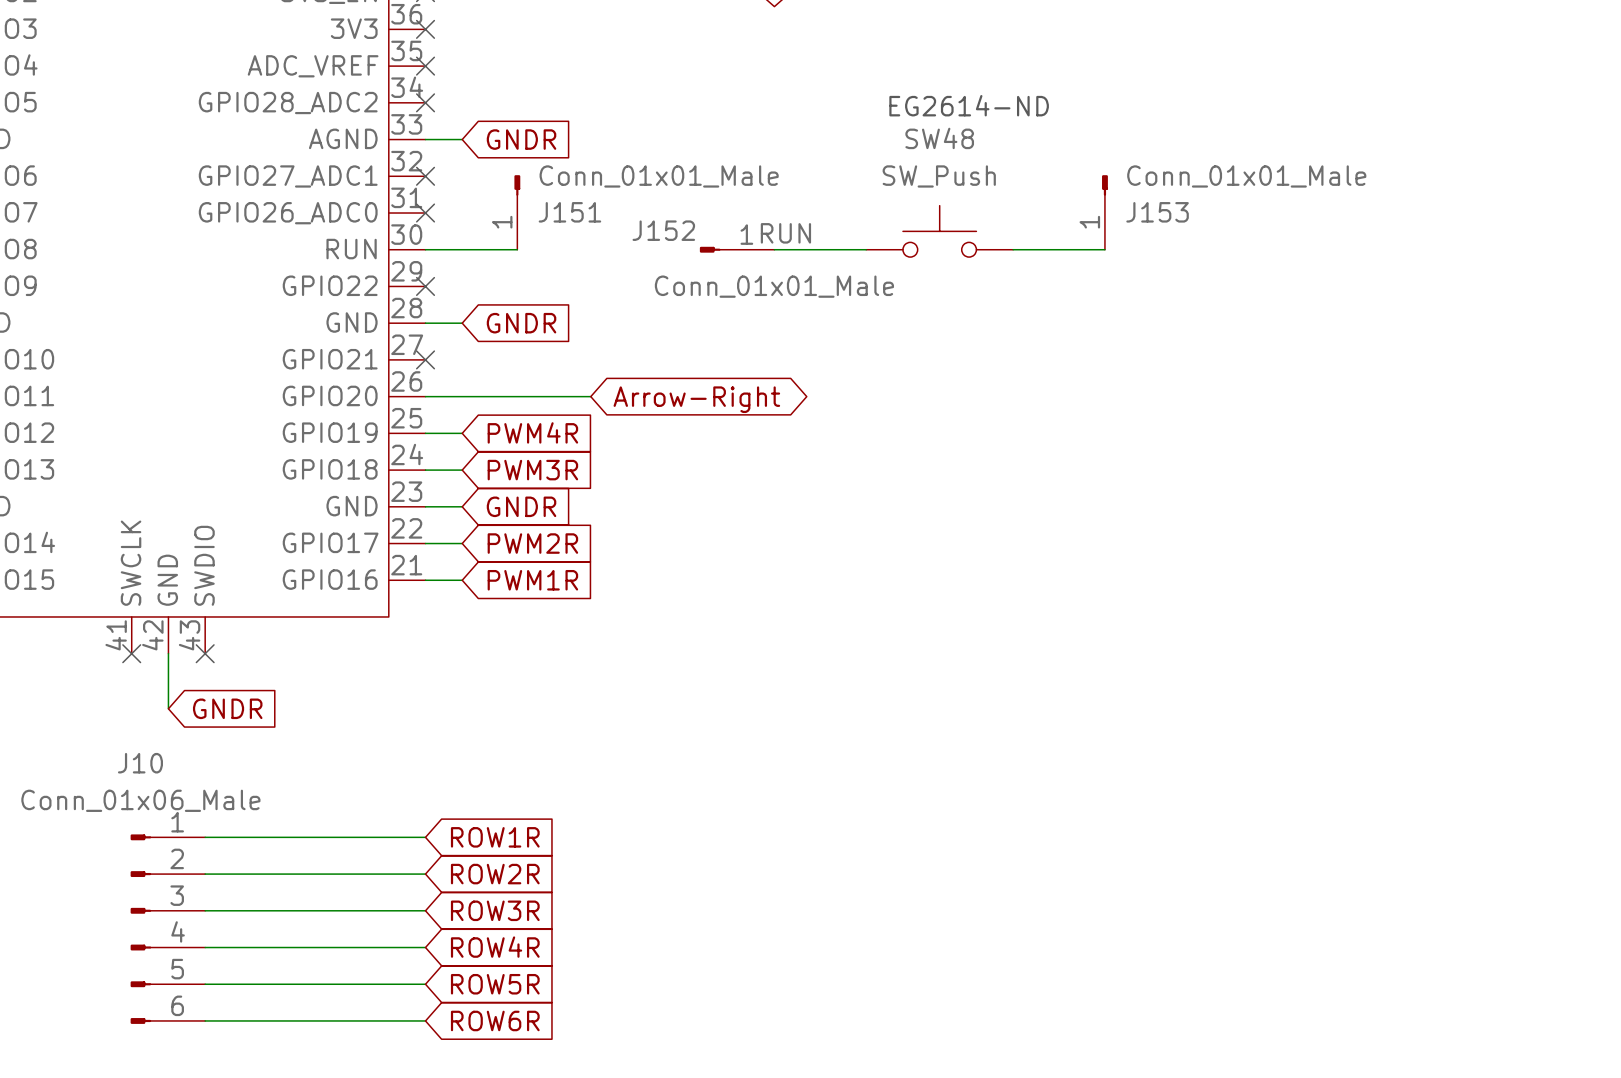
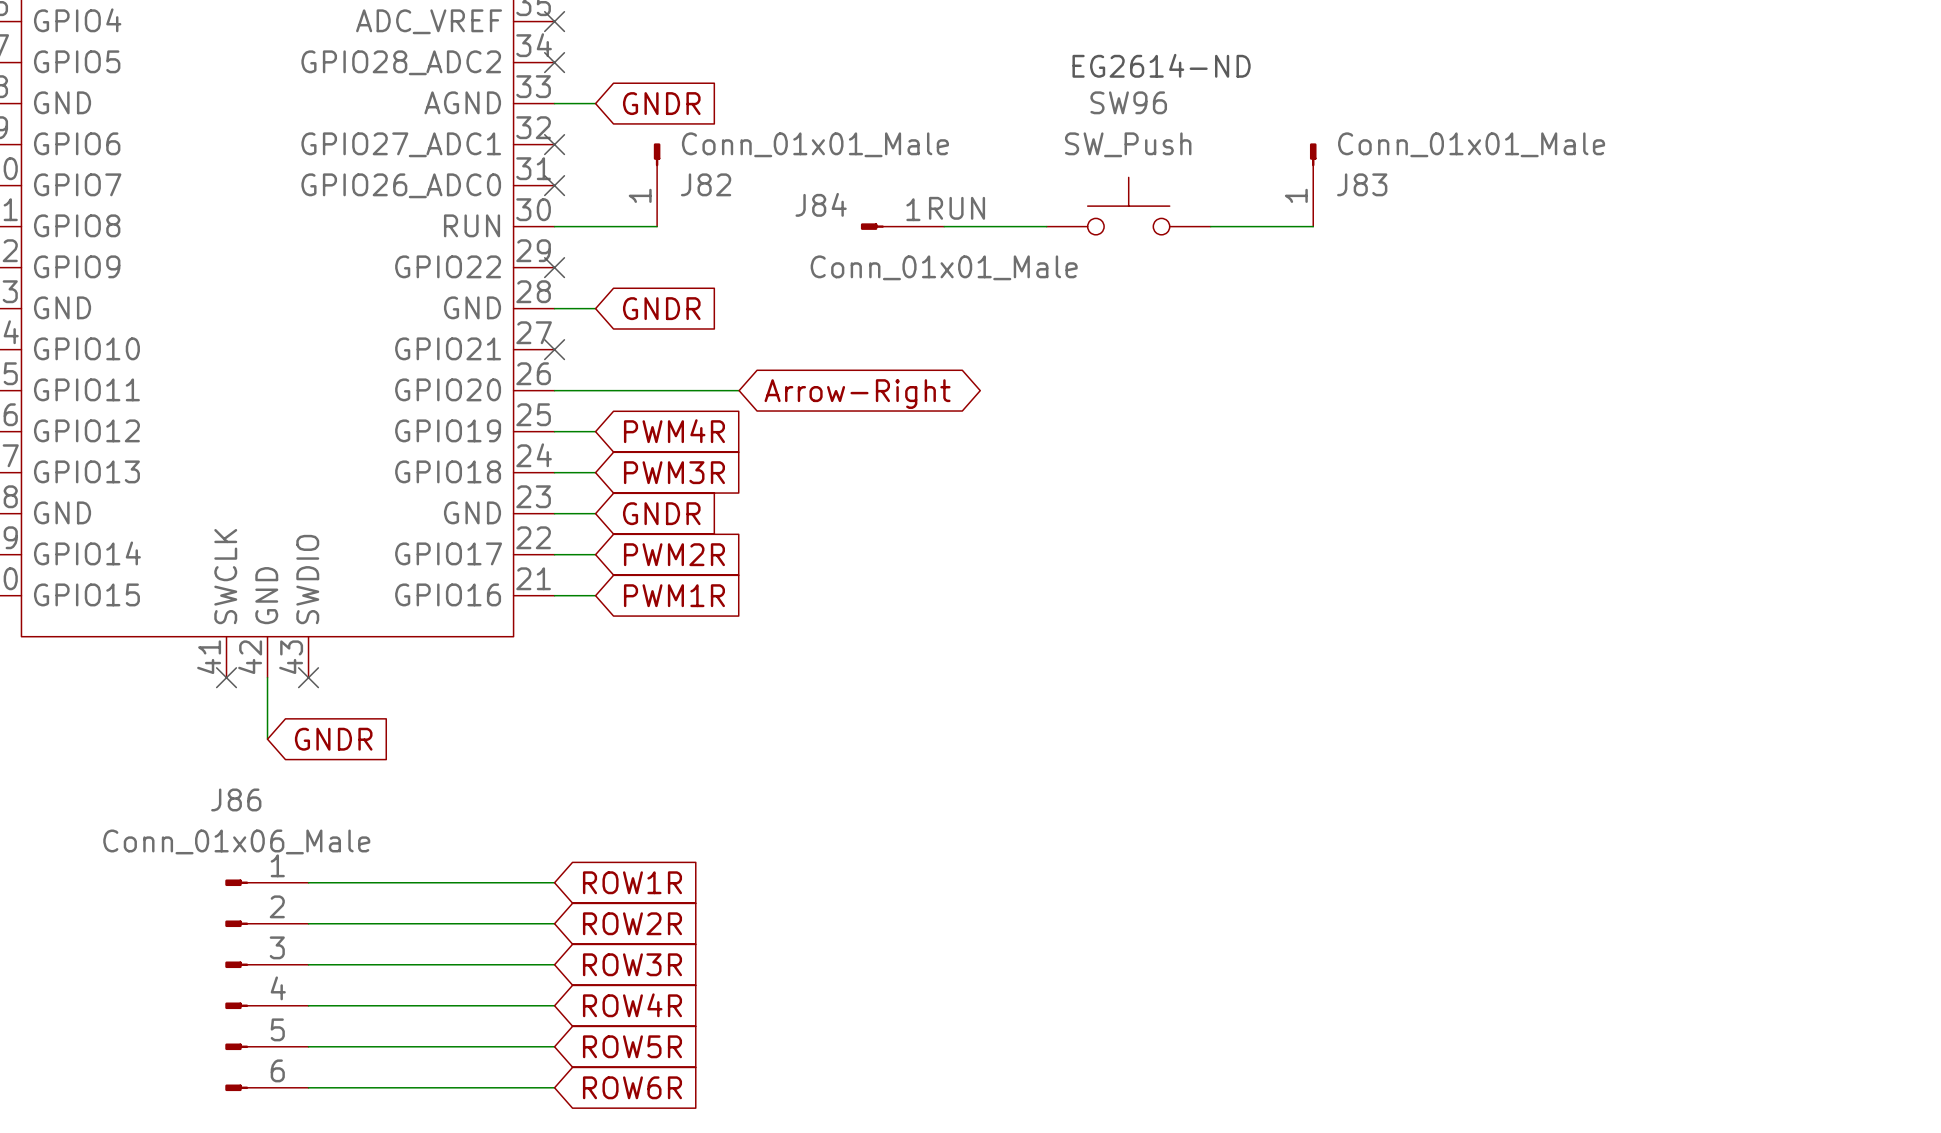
SW48 name: SW48 (939, 138) -> SW96 (1128, 102)
J151 name: J151 (569, 212) -> J82 (706, 184)
J153 name: J153 (1157, 212) -> J83 (1362, 184)
J152 name: J152 (663, 230) -> J84 (821, 204)
J10 name: J10 (140, 763) -> J86 (236, 799)

